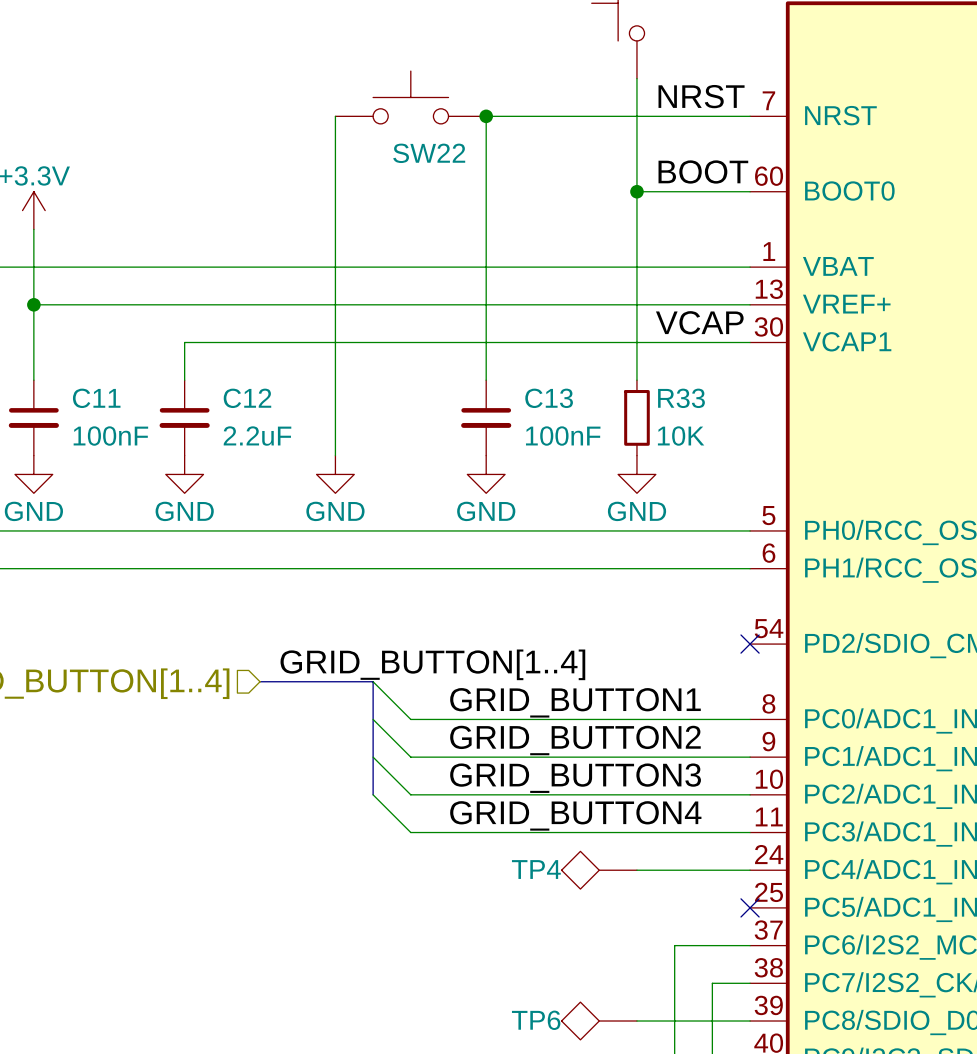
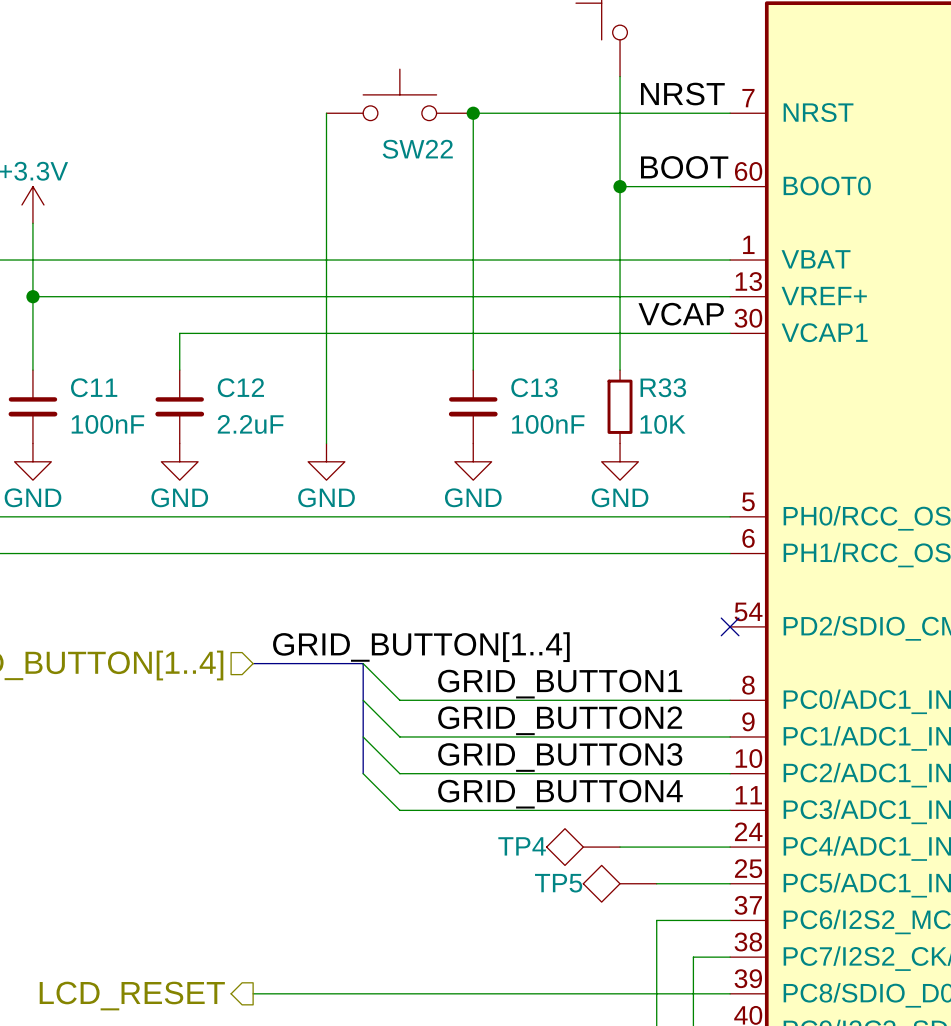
TP5: none -> (620, 883)
wire: none -> (656, 883) (730, 883)
no-connect mark: (750, 907) -> none
wire: none -> (253, 993) (620, 993)
TP6: (599, 1021) -> none
hierarchical label: none -> LCD_RESET (132, 996)

